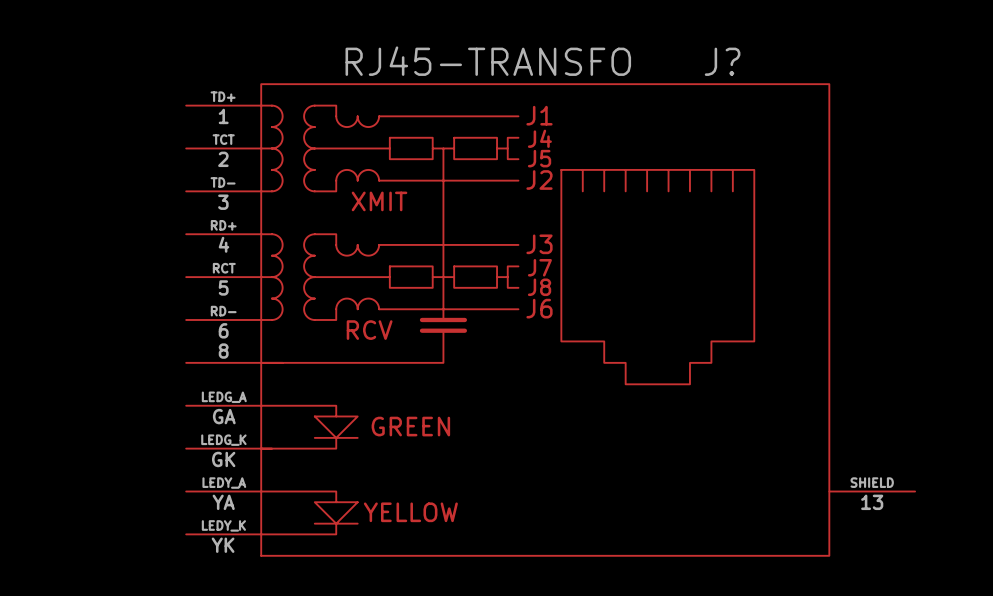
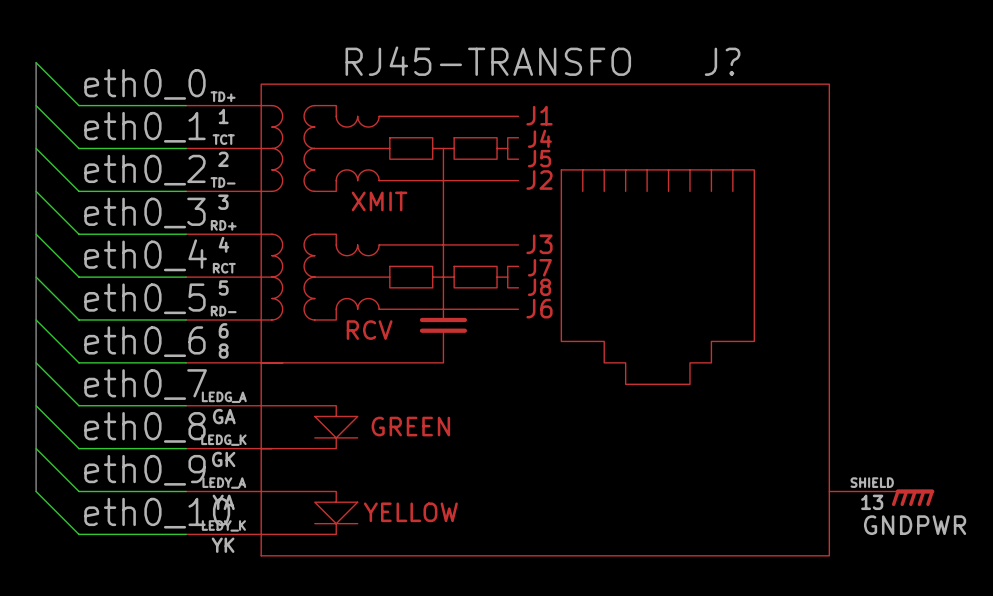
bus: none -> (36, 62) (36, 491)
wire: none -> (36, 62) (78, 105) (186, 105)
label: none -> eth0_0 (144, 84)
wire: none -> (36, 105) (78, 148) (186, 148)
label: none -> eth0_1 (144, 127)
wire: none -> (36, 148) (78, 191) (186, 191)
label: none -> eth0_2 (144, 170)
wire: none -> (36, 191) (78, 234) (186, 234)
label: none -> eth0_3 (144, 213)
wire: none -> (36, 234) (78, 277) (186, 277)
label: none -> eth0_4 (145, 255)
wire: none -> (36, 277) (78, 319) (186, 319)
label: none -> eth0_5 (144, 298)
wire: none -> (36, 319) (78, 362) (186, 362)
label: none -> eth0_6 (144, 341)
wire: none -> (36, 362) (78, 405) (186, 405)
label: none -> eth0_7 (145, 384)
wire: none -> (36, 405) (78, 448) (186, 448)
label: none -> eth0_8 (144, 427)
wire: none -> (36, 448) (78, 491) (186, 491)
label: none -> eth0_9 (144, 470)
wire: none -> (36, 491) (78, 534) (186, 534)
power symbol: none -> GNDPWR (913, 497)
label: none -> eth0_10 (157, 513)

